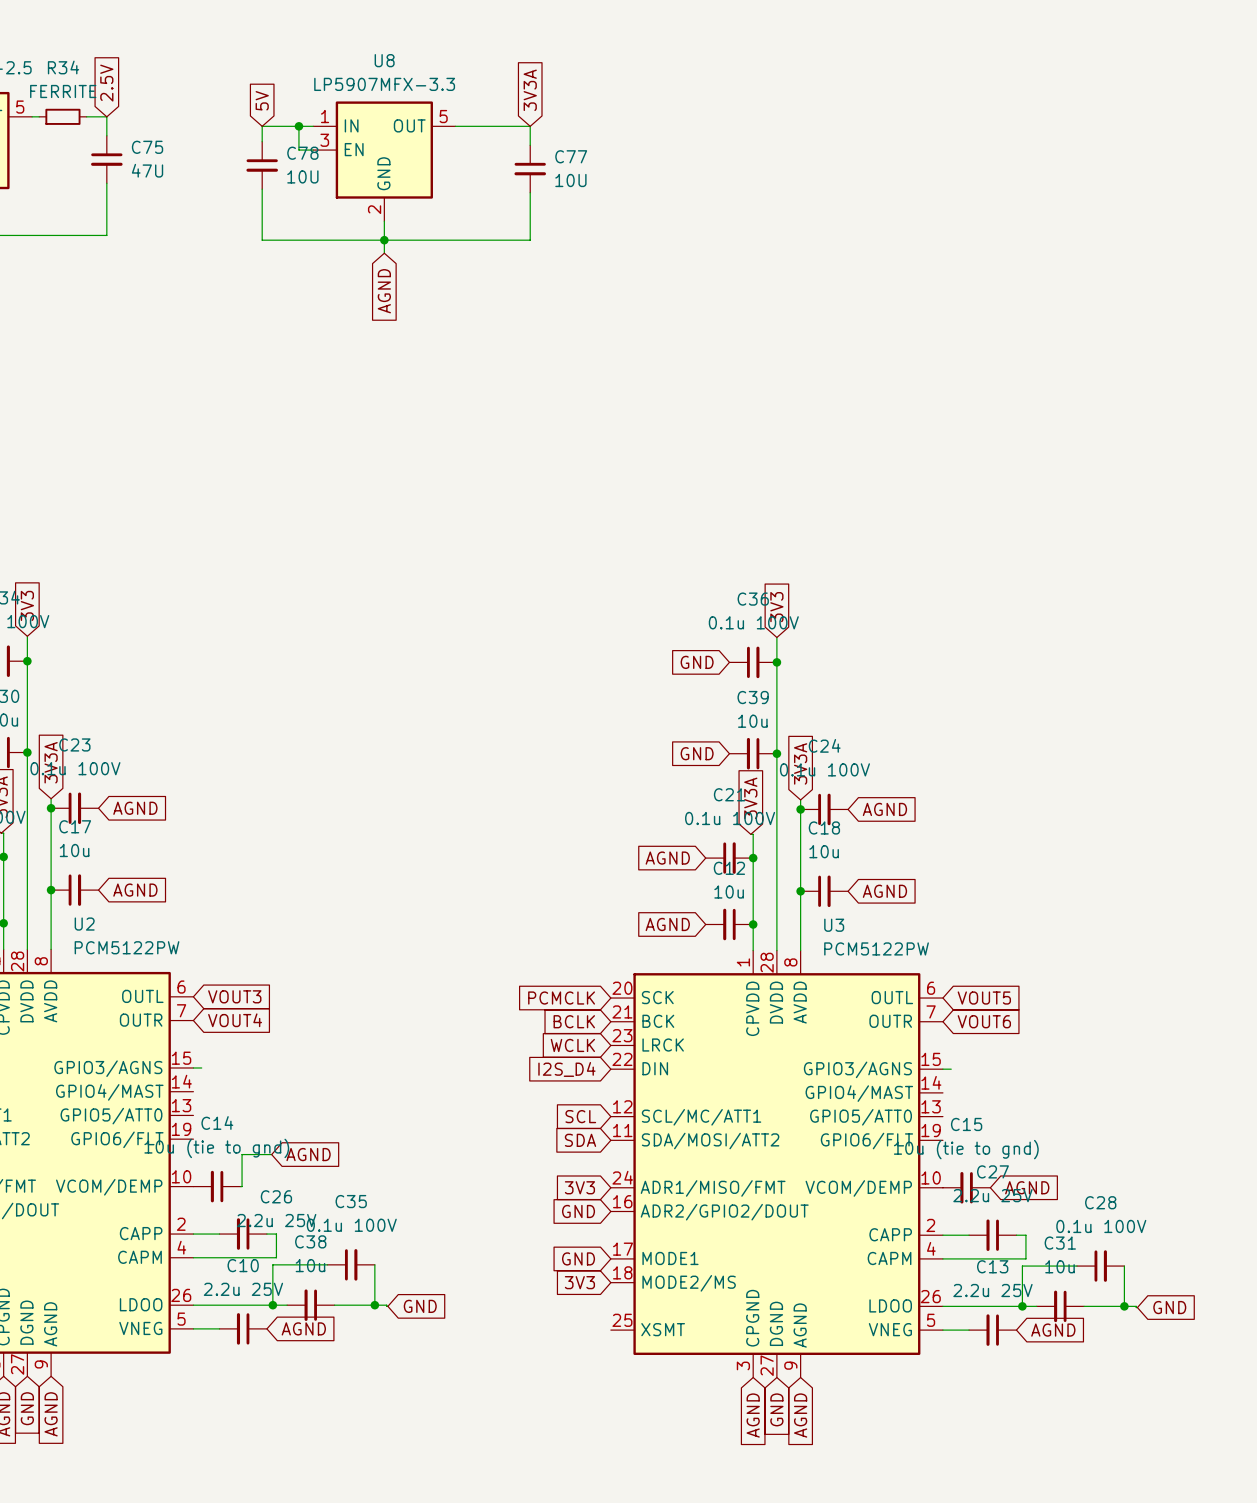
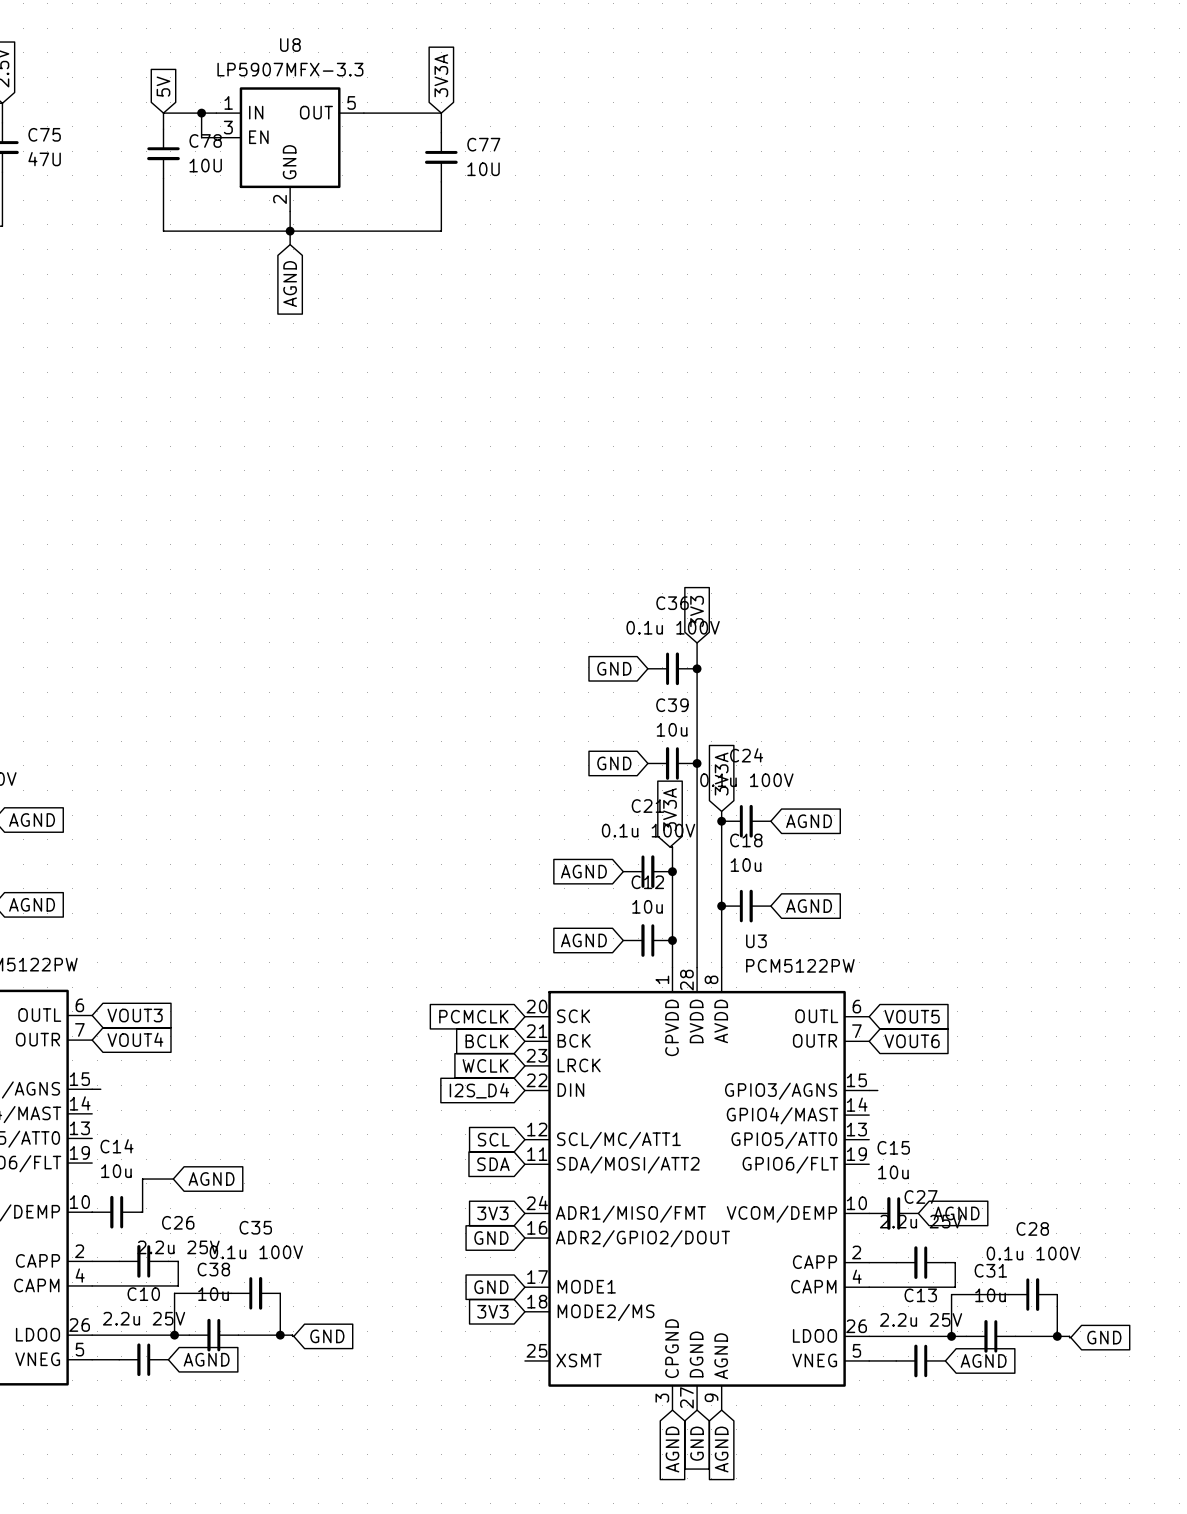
C14 value: 10u (tie to gnd) (216, 1148) -> 10u (116, 1171)
C15 value: 10u (tie to gnd) (966, 1149) -> 10u (893, 1172)

